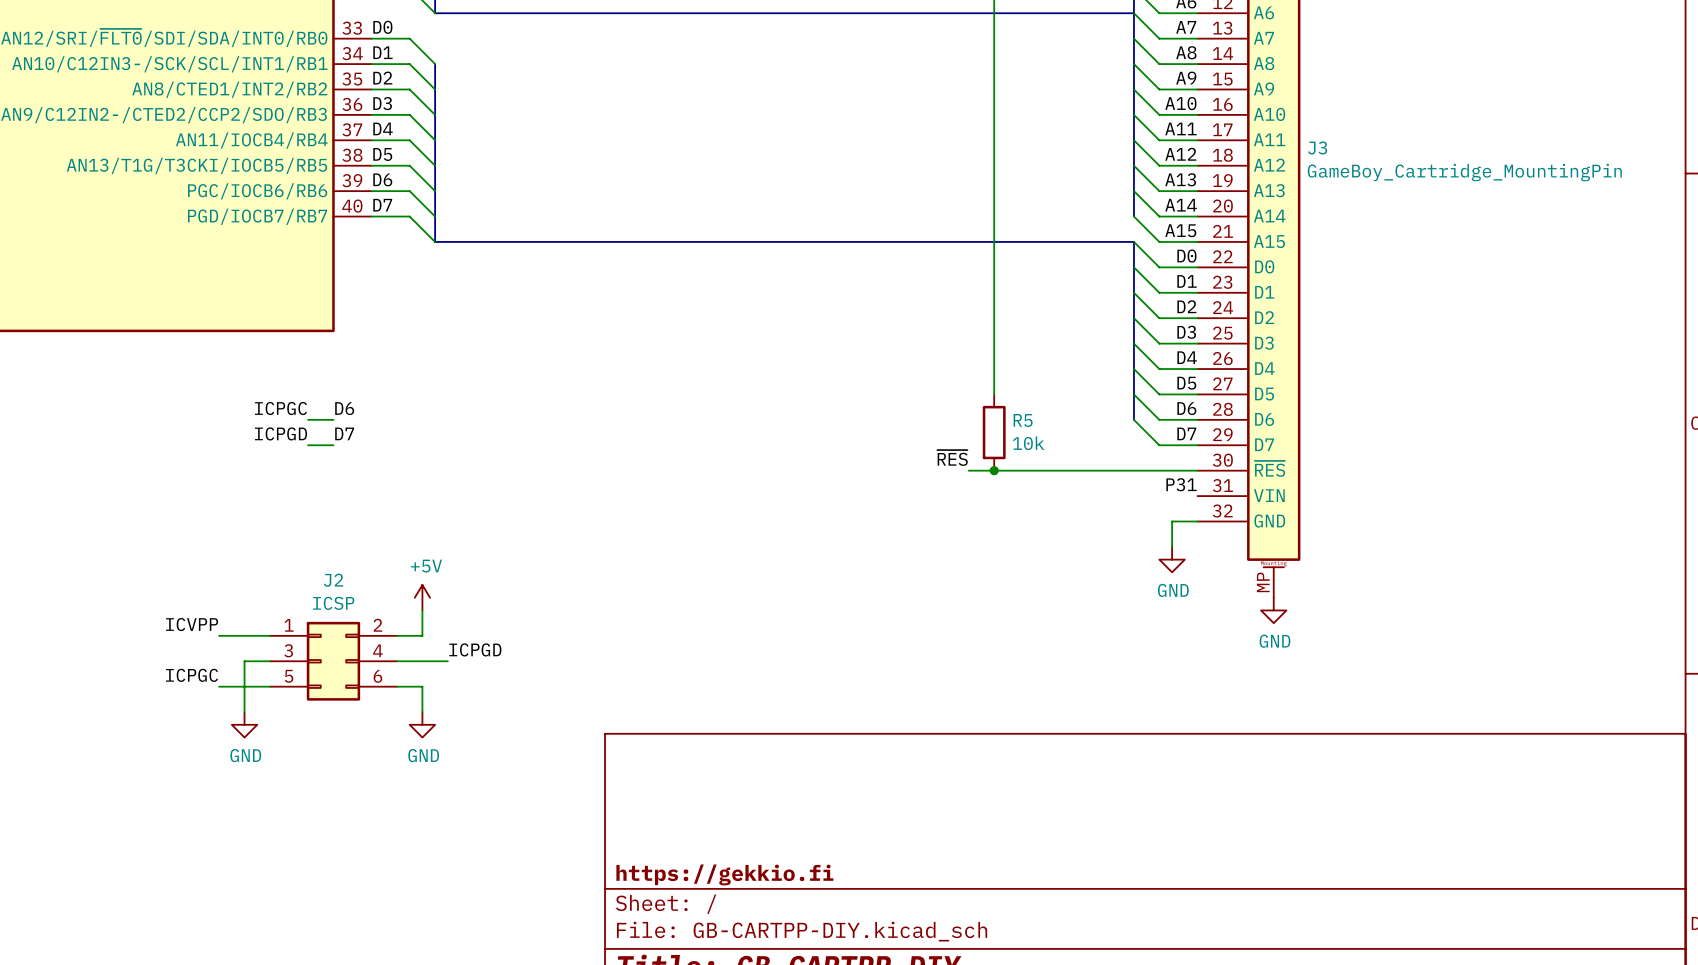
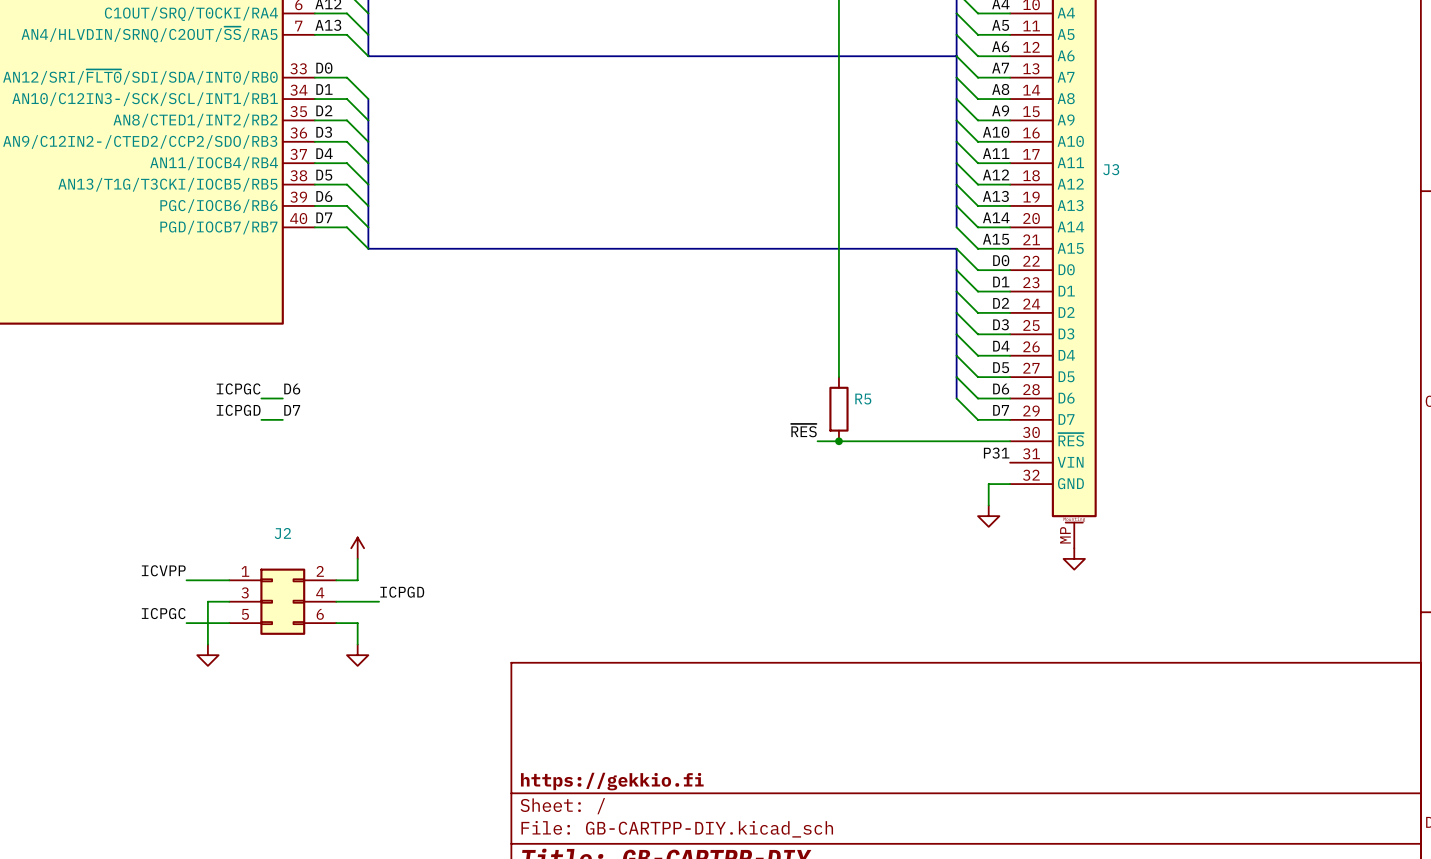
J3 value: GameBoy_Cartridge_MountingPin (1464, 172) -> none
R5 value: 10k (1028, 443) -> none
power symbol text: +5V (426, 566) -> none
power symbol text: GND (1173, 590) -> none
J2 value: ICSP (333, 603) -> none
power symbol text: GND (1275, 641) -> none
power symbol text: GND (245, 755) -> none
power symbol text: GND (423, 755) -> none

